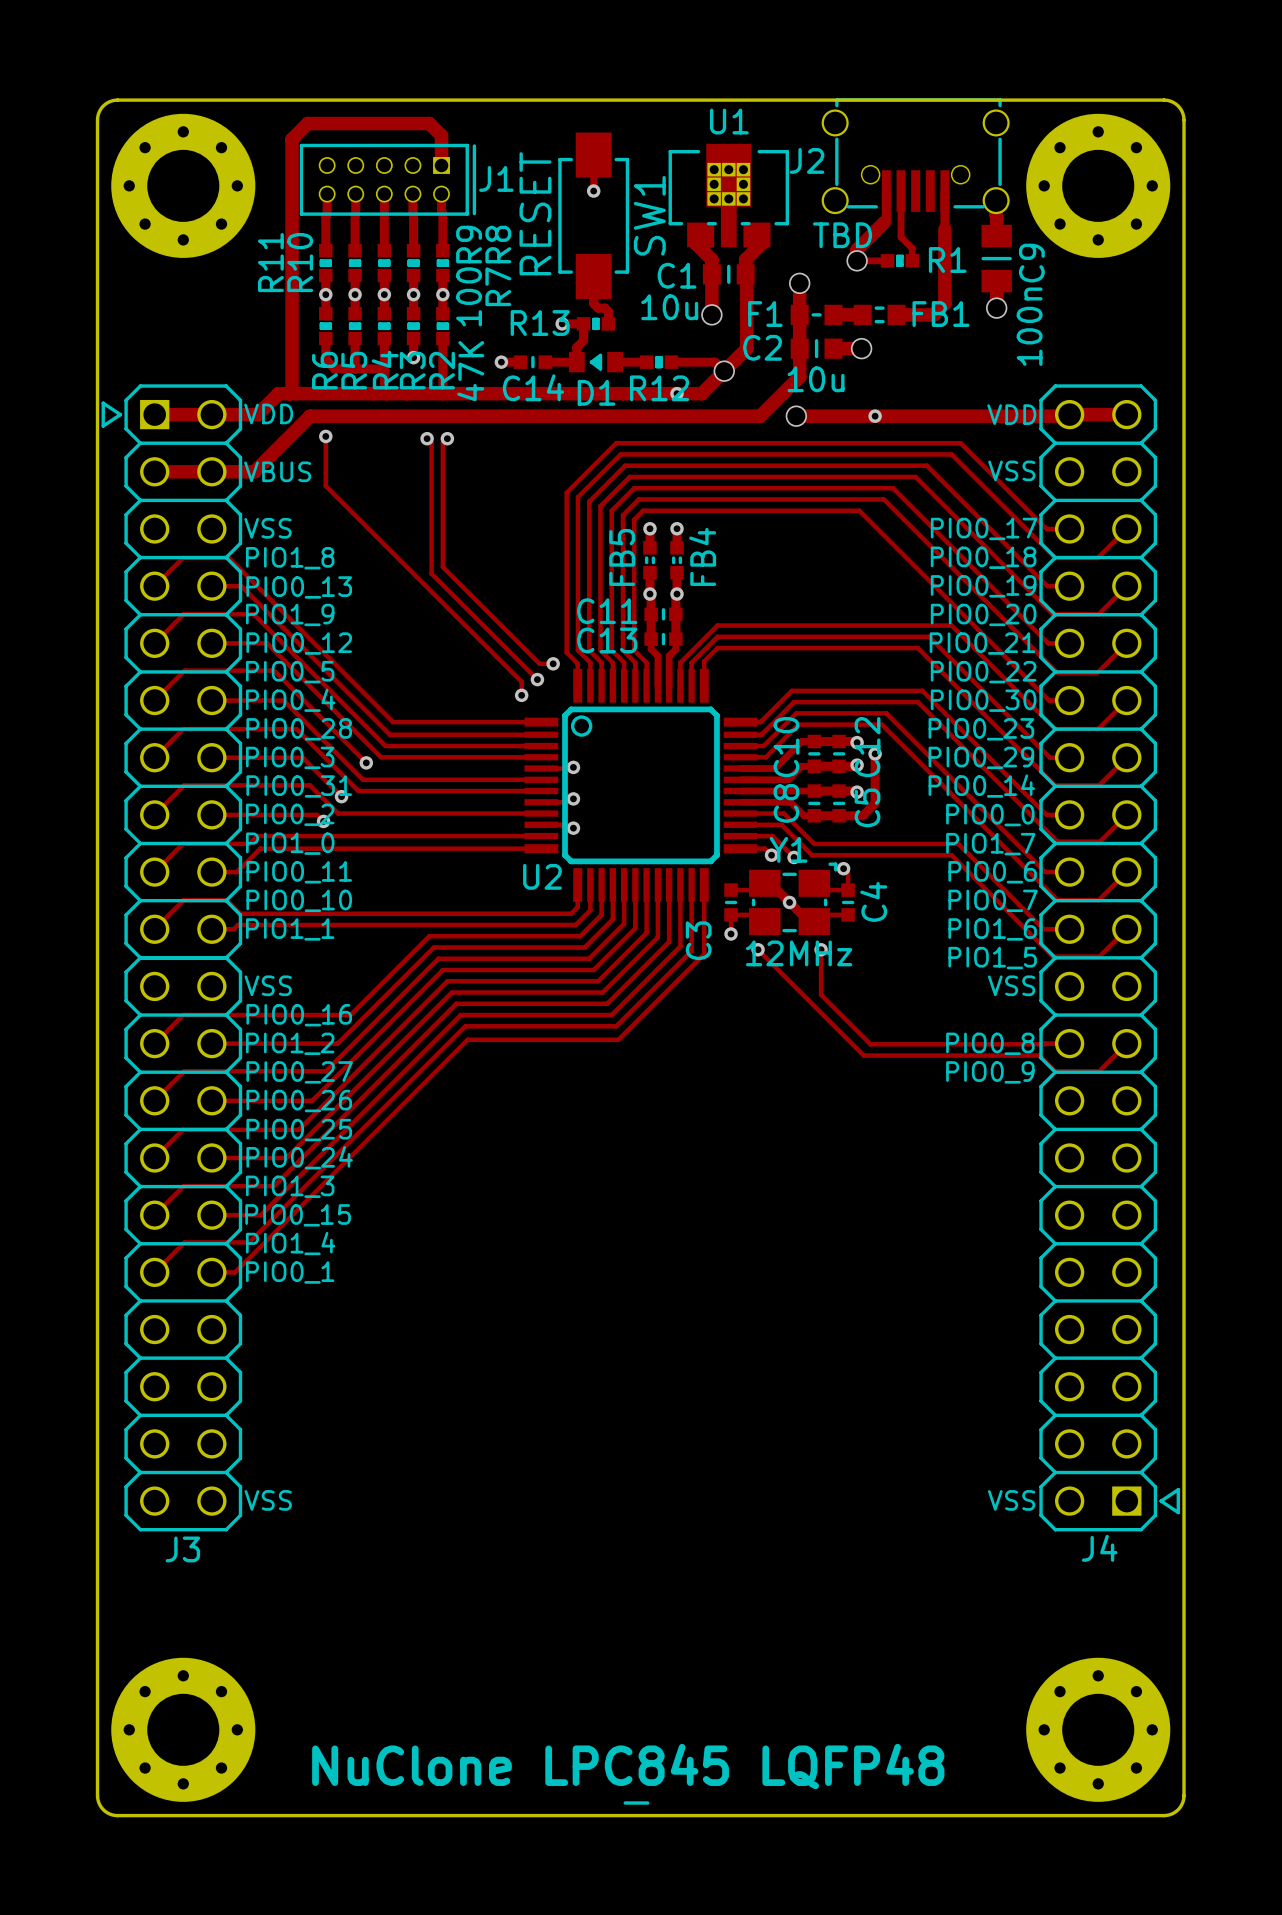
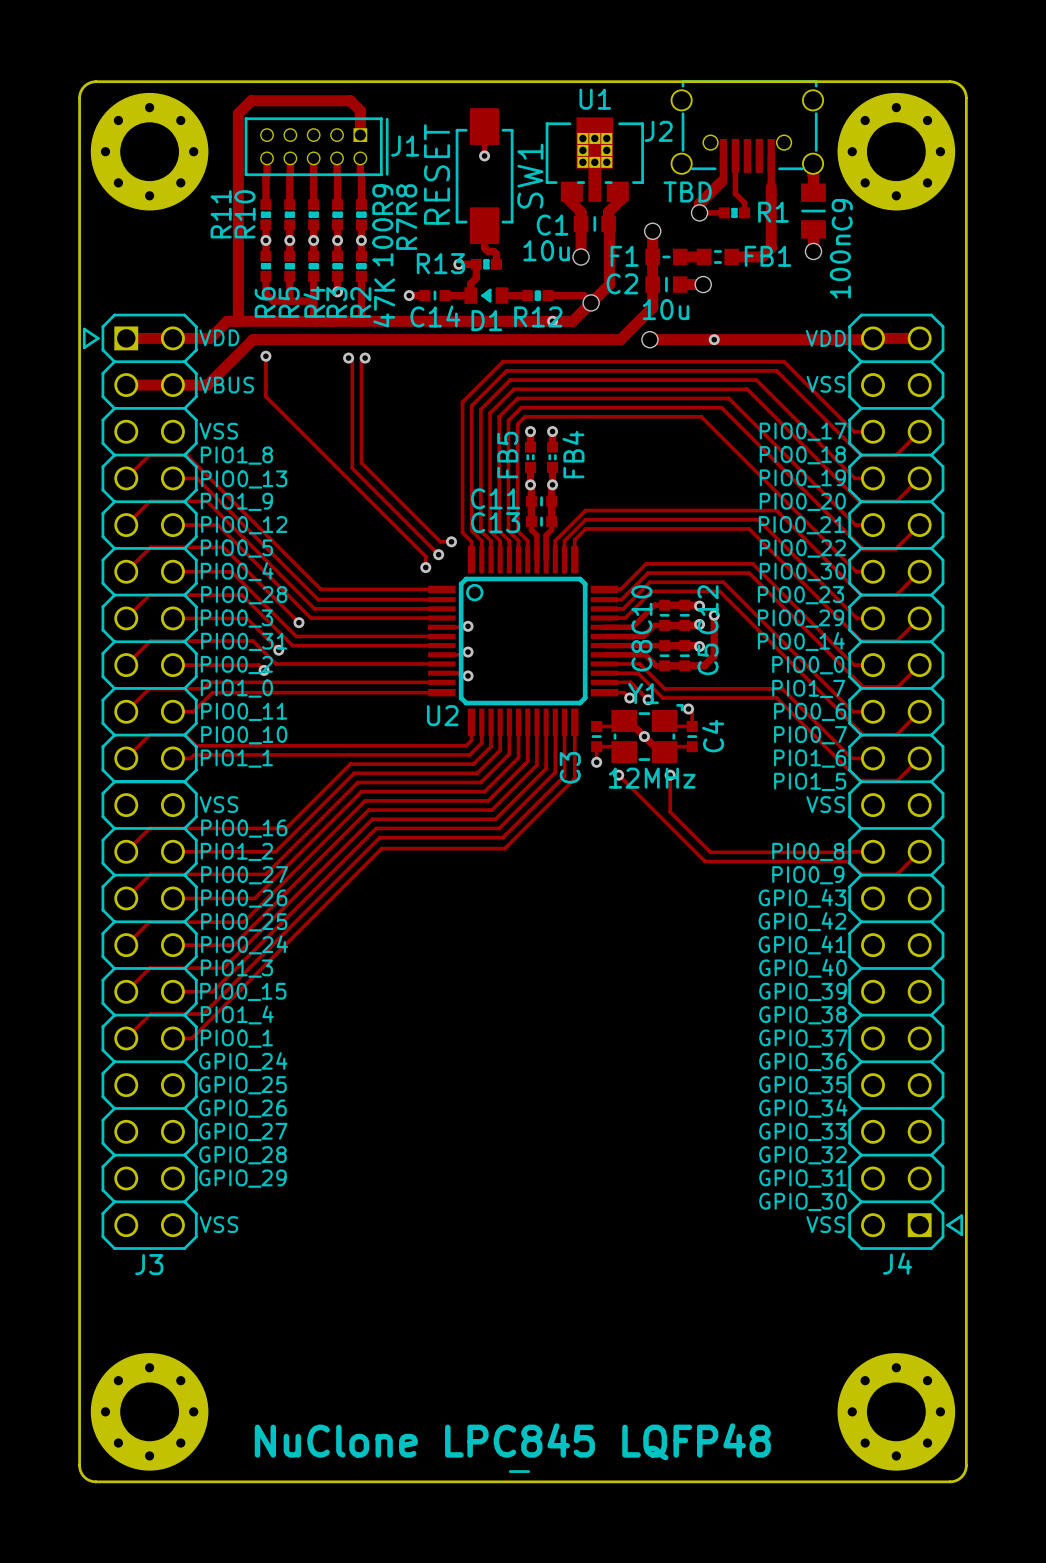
J4 footprint: [1039, 384, 1180, 1532] -> [848, 313, 964, 1250]
J3 text: none -> GPIO_24 (243, 1061)
J3 text: none -> GPIO_25 (242, 1085)
J3 text: none -> GPIO_26 (242, 1108)
J3 text: none -> GPIO_27 (243, 1131)
J3 text: none -> GPIO_28 (242, 1155)
J3 text: none -> GPIO_29 (242, 1178)

